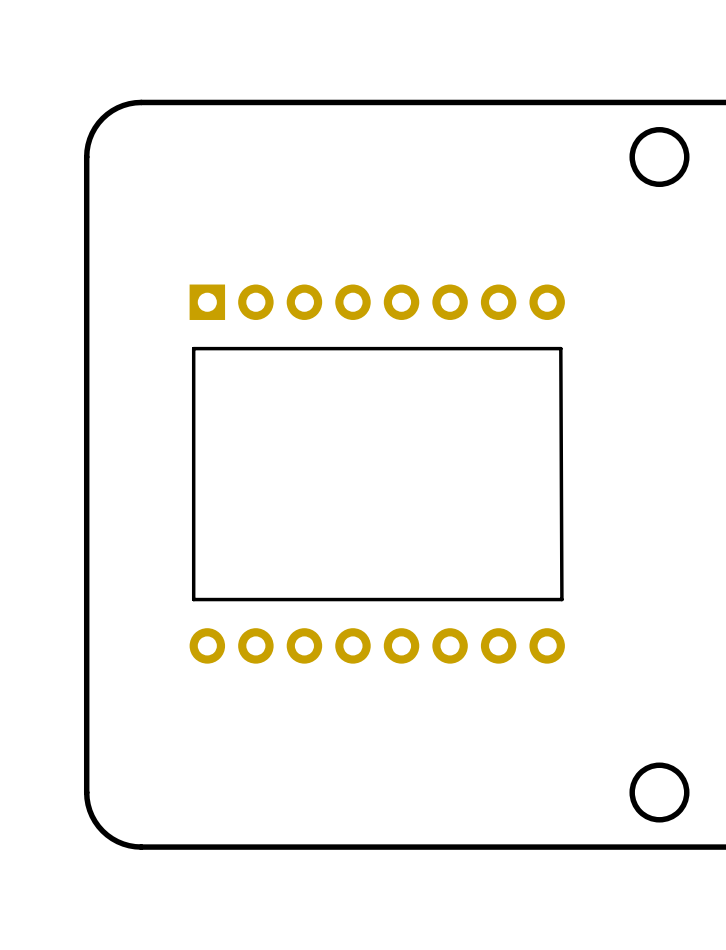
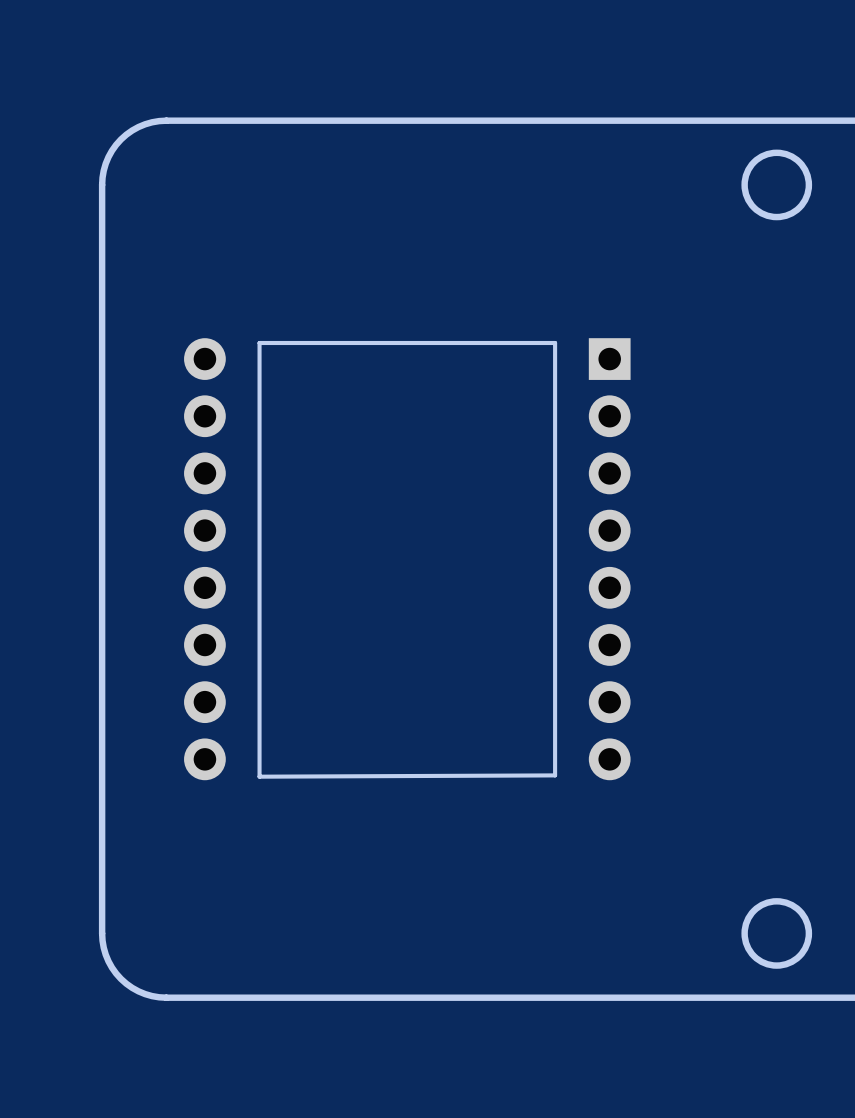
part rotation: 0° (377, 474) -> 90° clockwise (407, 559)

